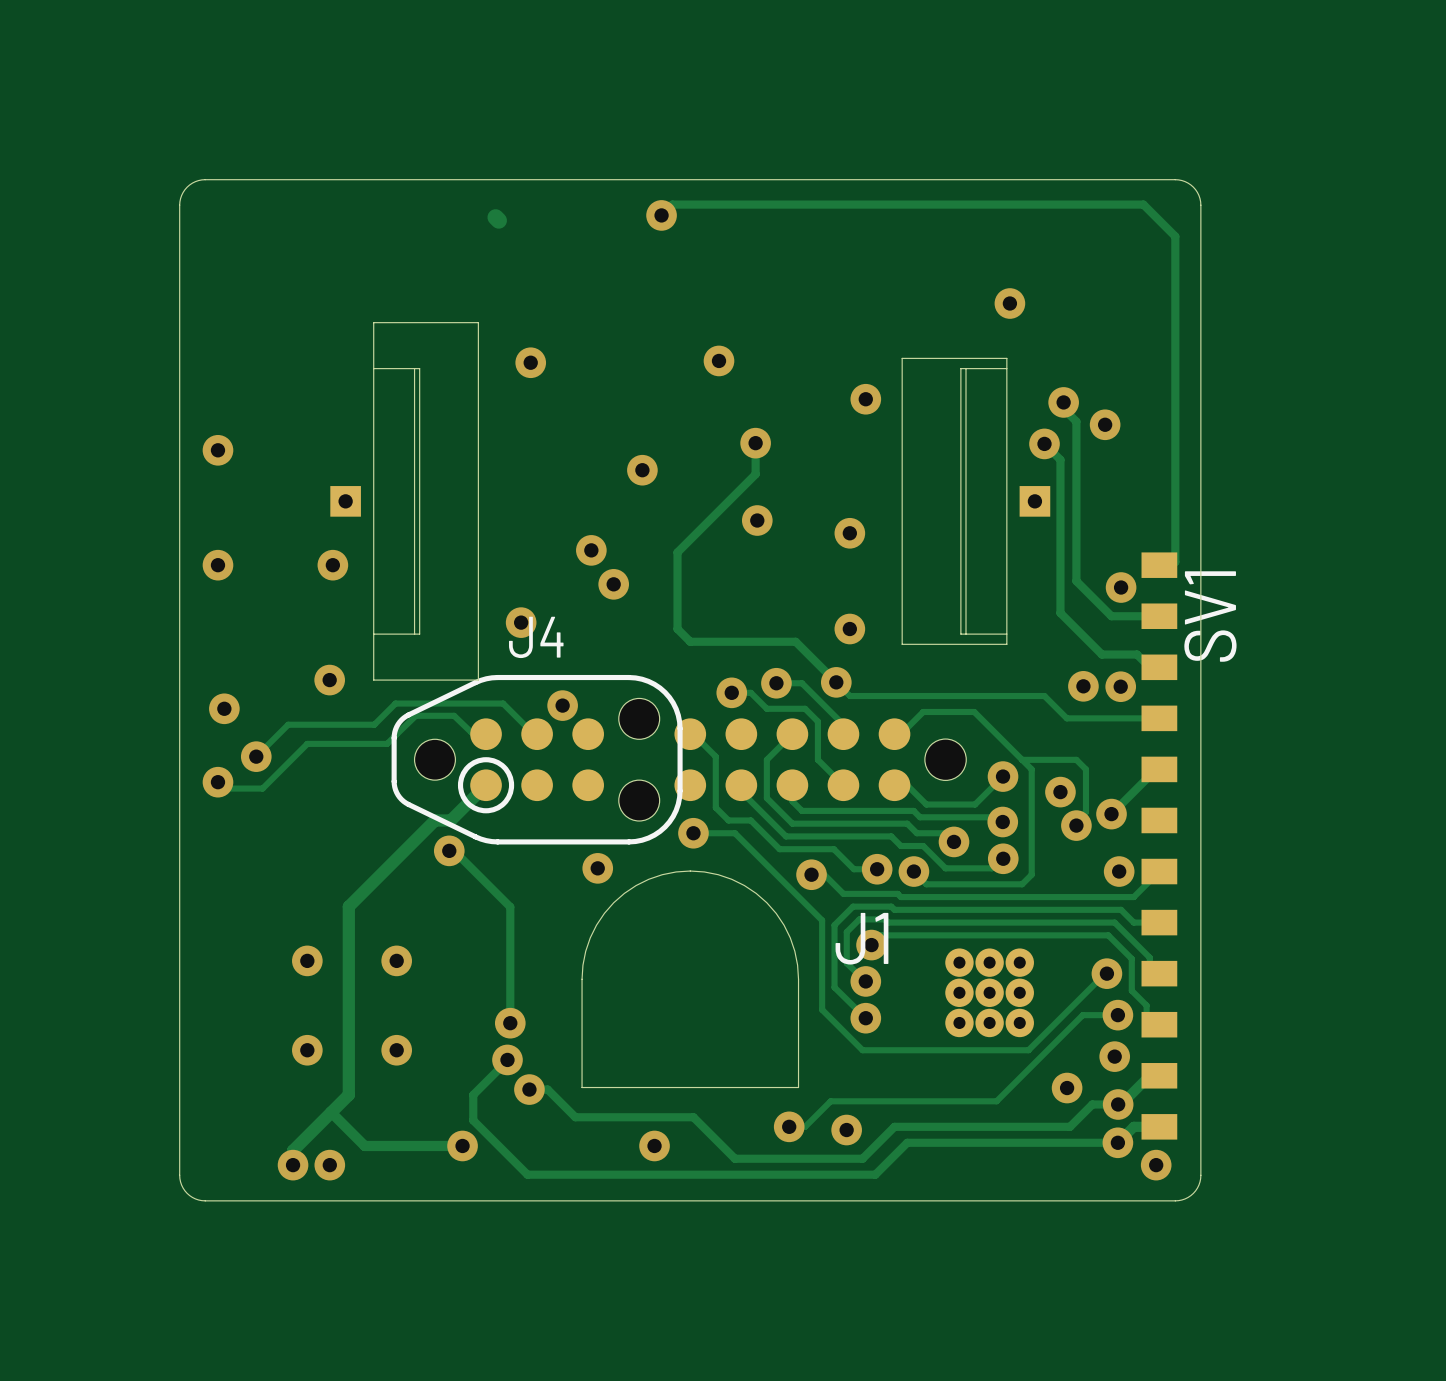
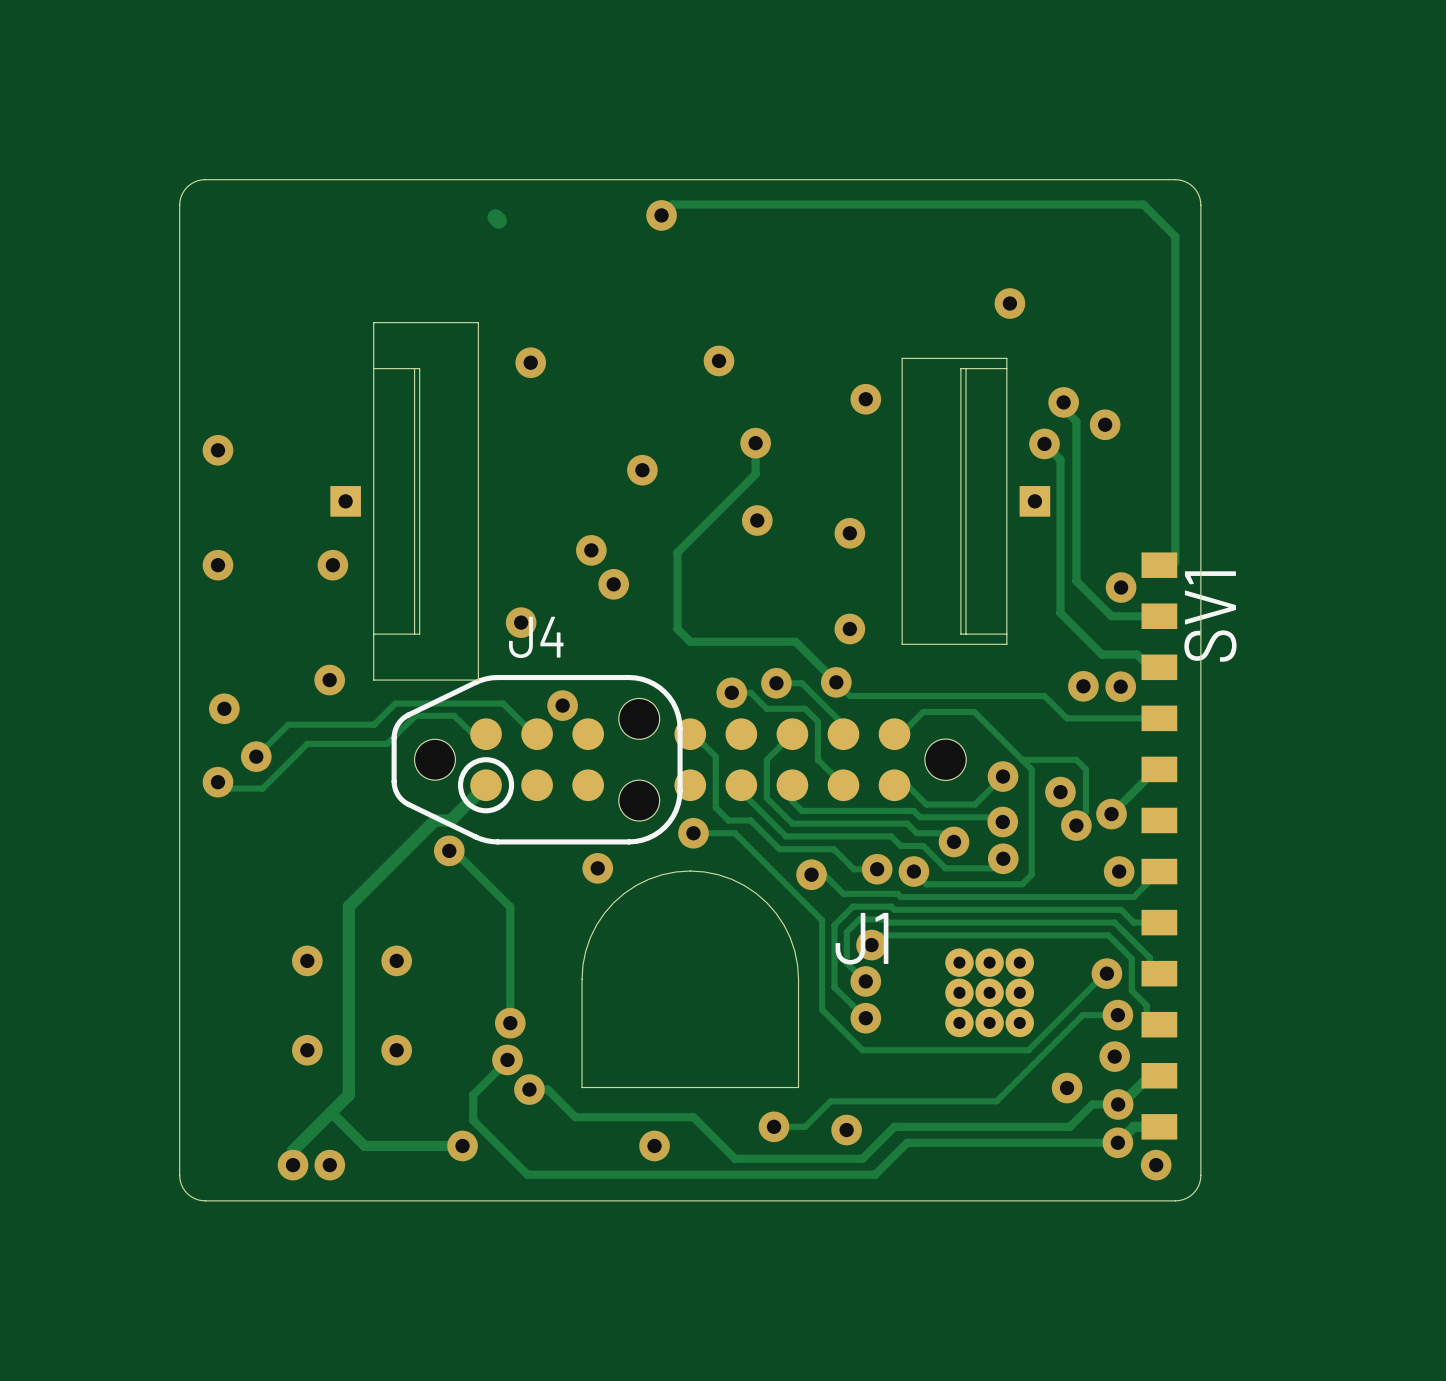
via position: (789, 1126) -> (774, 1126)

